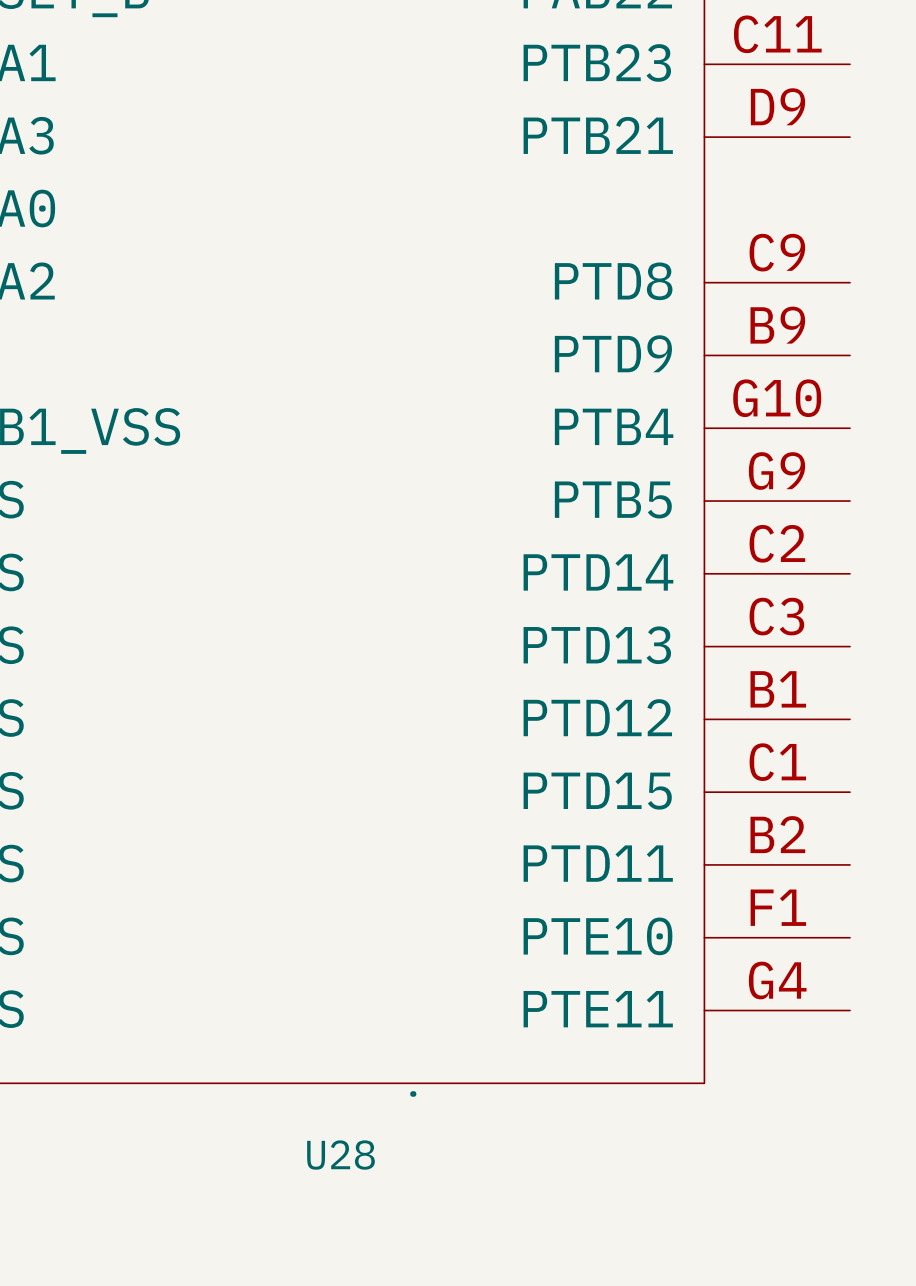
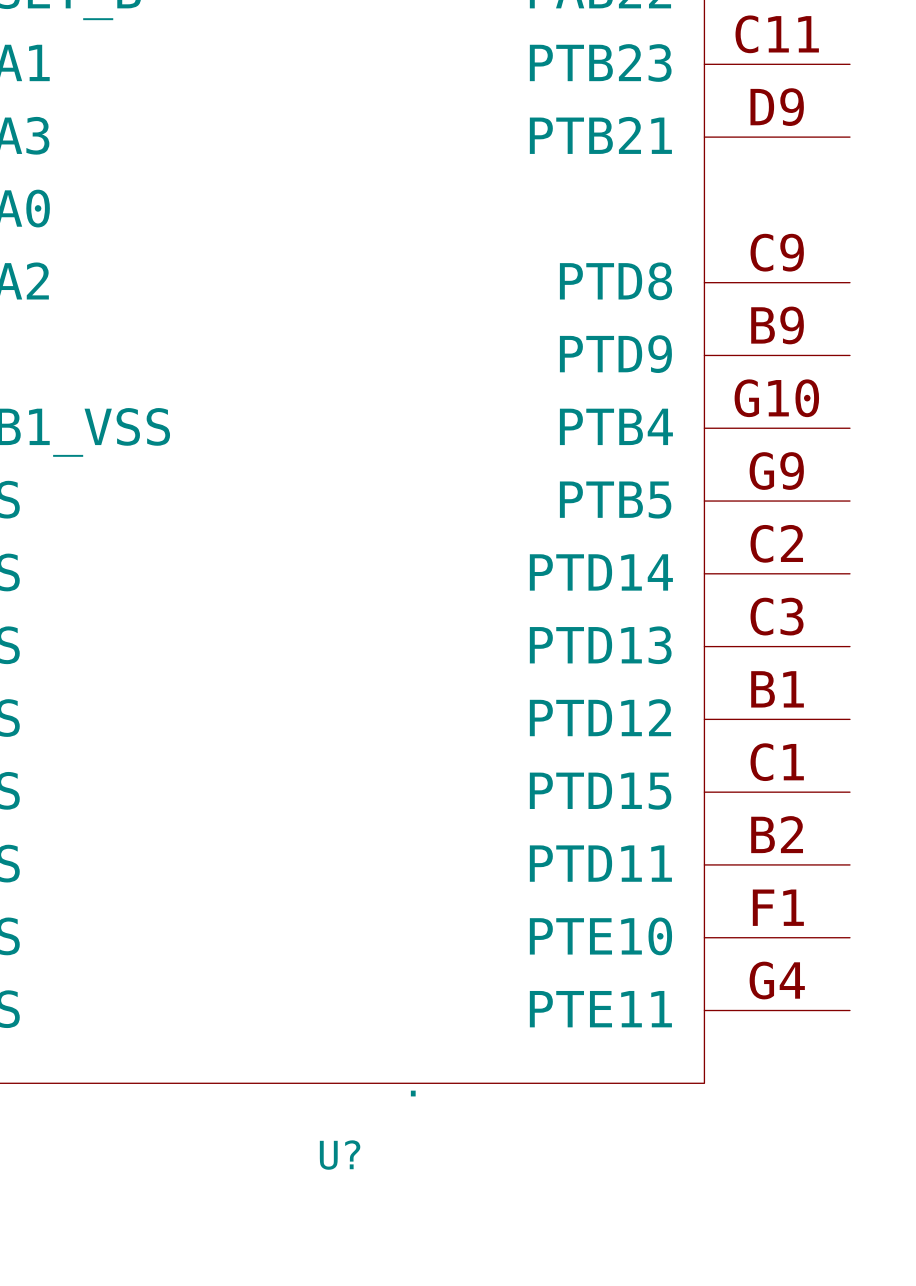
U28 name: U28 (341, 1155) -> U? (340, 1155)

